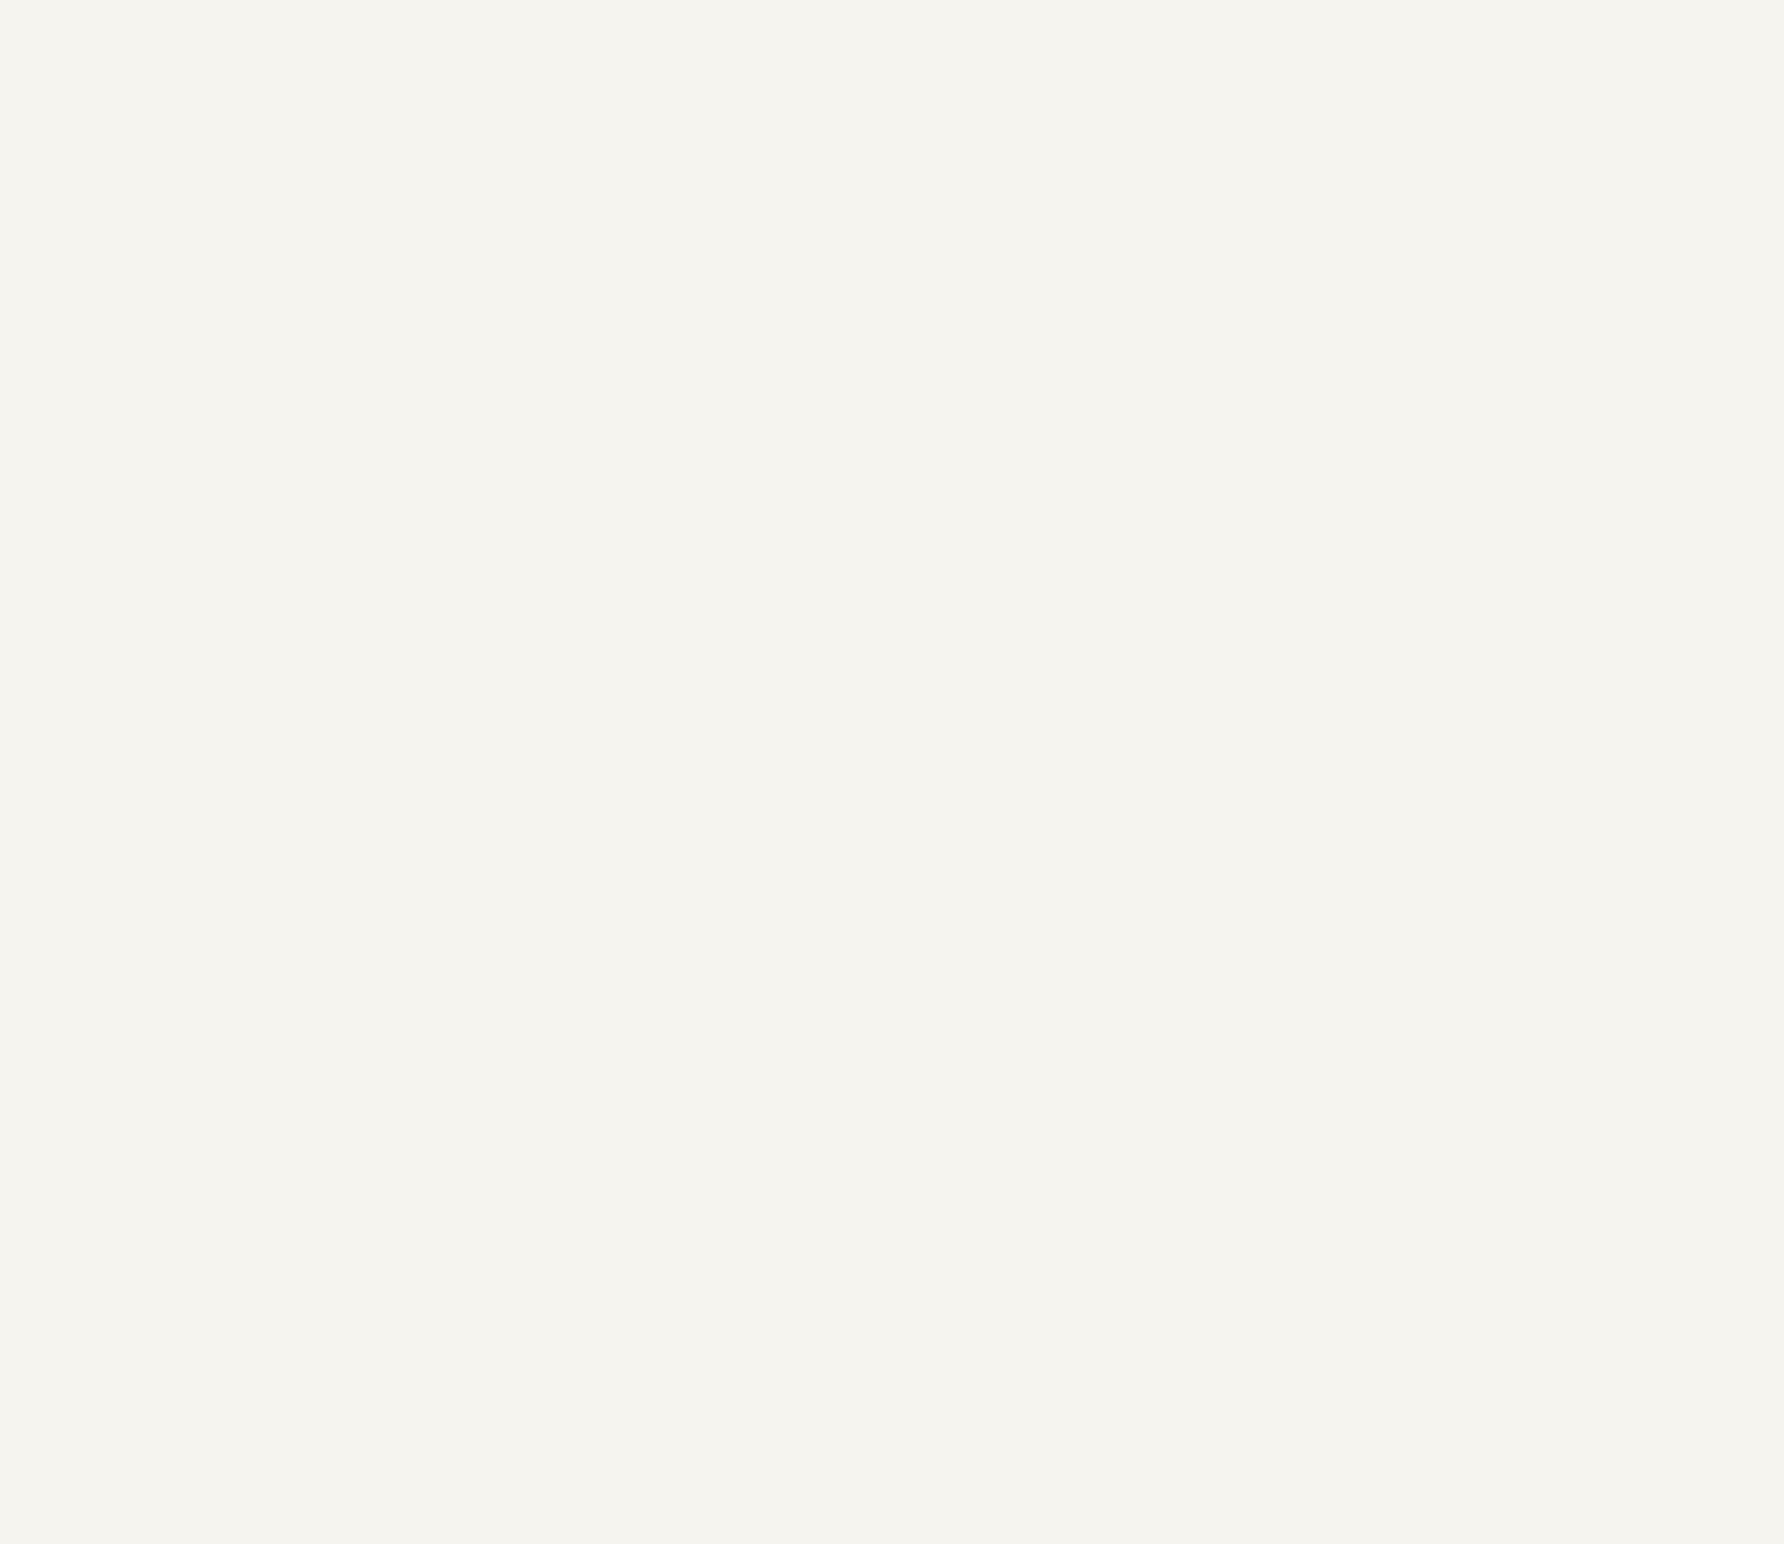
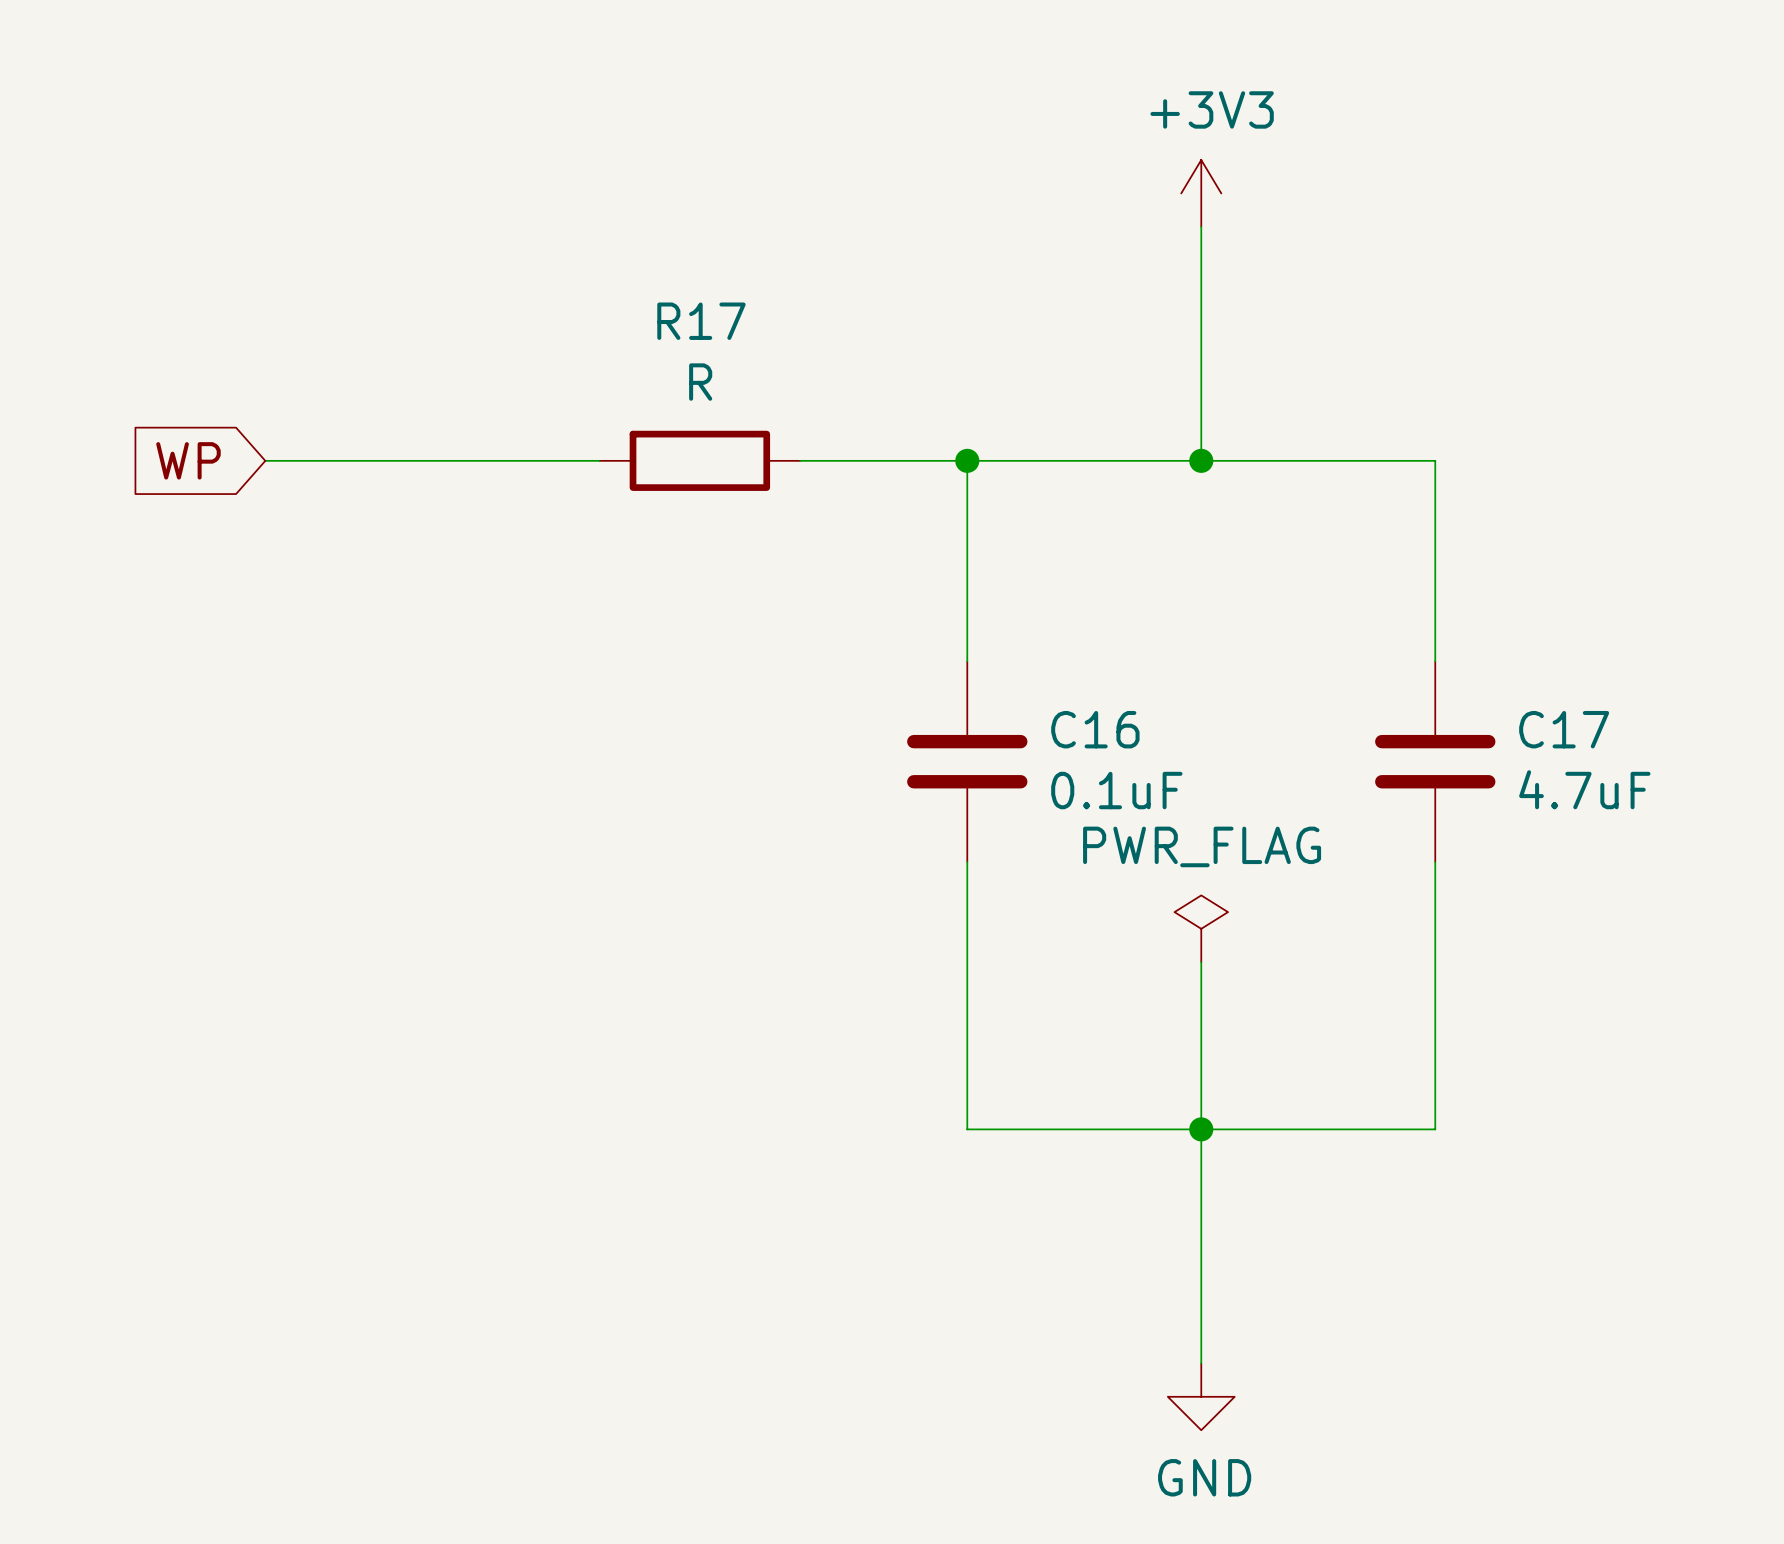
power symbol: none -> +3V3 (1201, 193)
wire: none -> (1201, 226) (1201, 460)
global label: none -> WP (188, 460)
wire: none -> (265, 460) (599, 460)
R17: none -> R (699, 460)
wire: none -> (800, 460) (1435, 460) (1435, 661)
wire: none -> (967, 460) (967, 661)
junction: none -> (967, 460)
junction: none -> (1201, 460)
C16: none -> 0.1uF (967, 761)
C17: none -> 4.7uF (1435, 761)
wire: none -> (967, 861) (967, 1129) (1435, 1129) (1435, 861)
power symbol: none -> PWR_FLAG (1201, 928)
wire: none -> (1201, 962) (1201, 1363)
junction: none -> (1201, 1129)
power symbol: none -> GND (1201, 1396)

